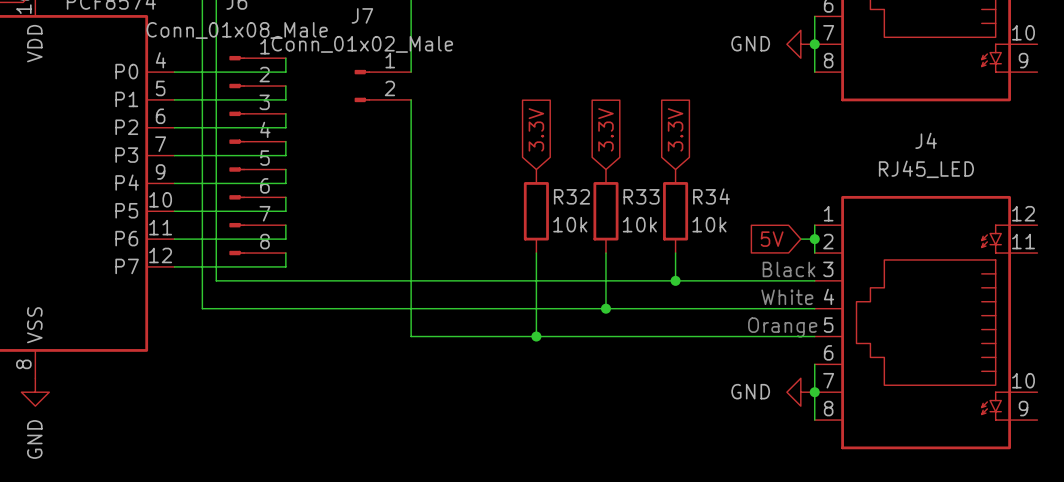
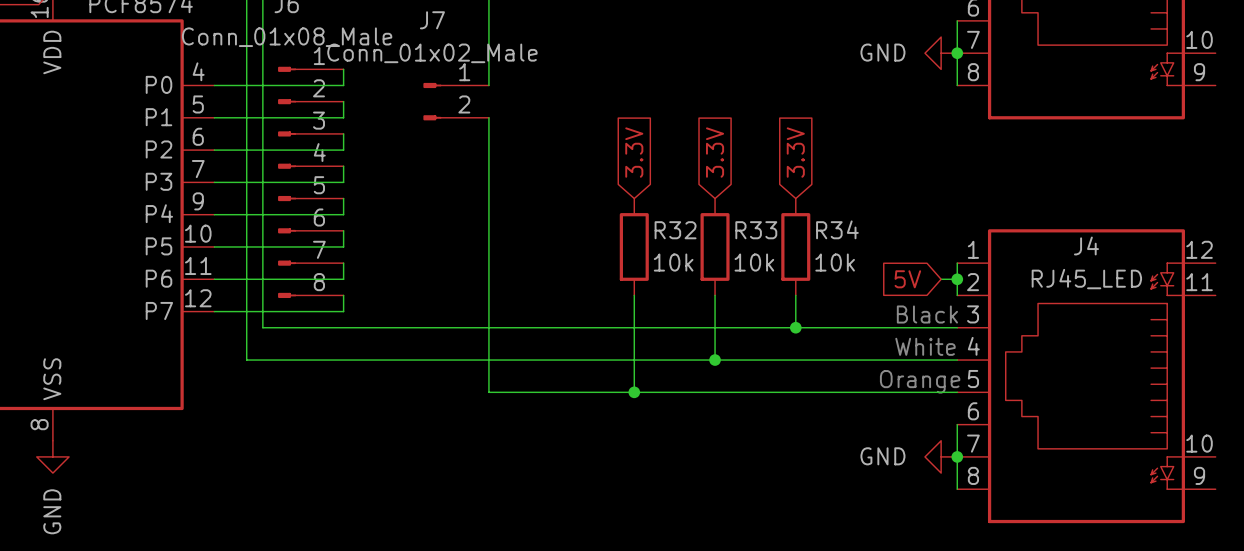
J4 name position: J4 (926, 140) -> J4 (1086, 246)
J4 value position: RJ45_LED (926, 169) -> RJ45_LED (1086, 279)

